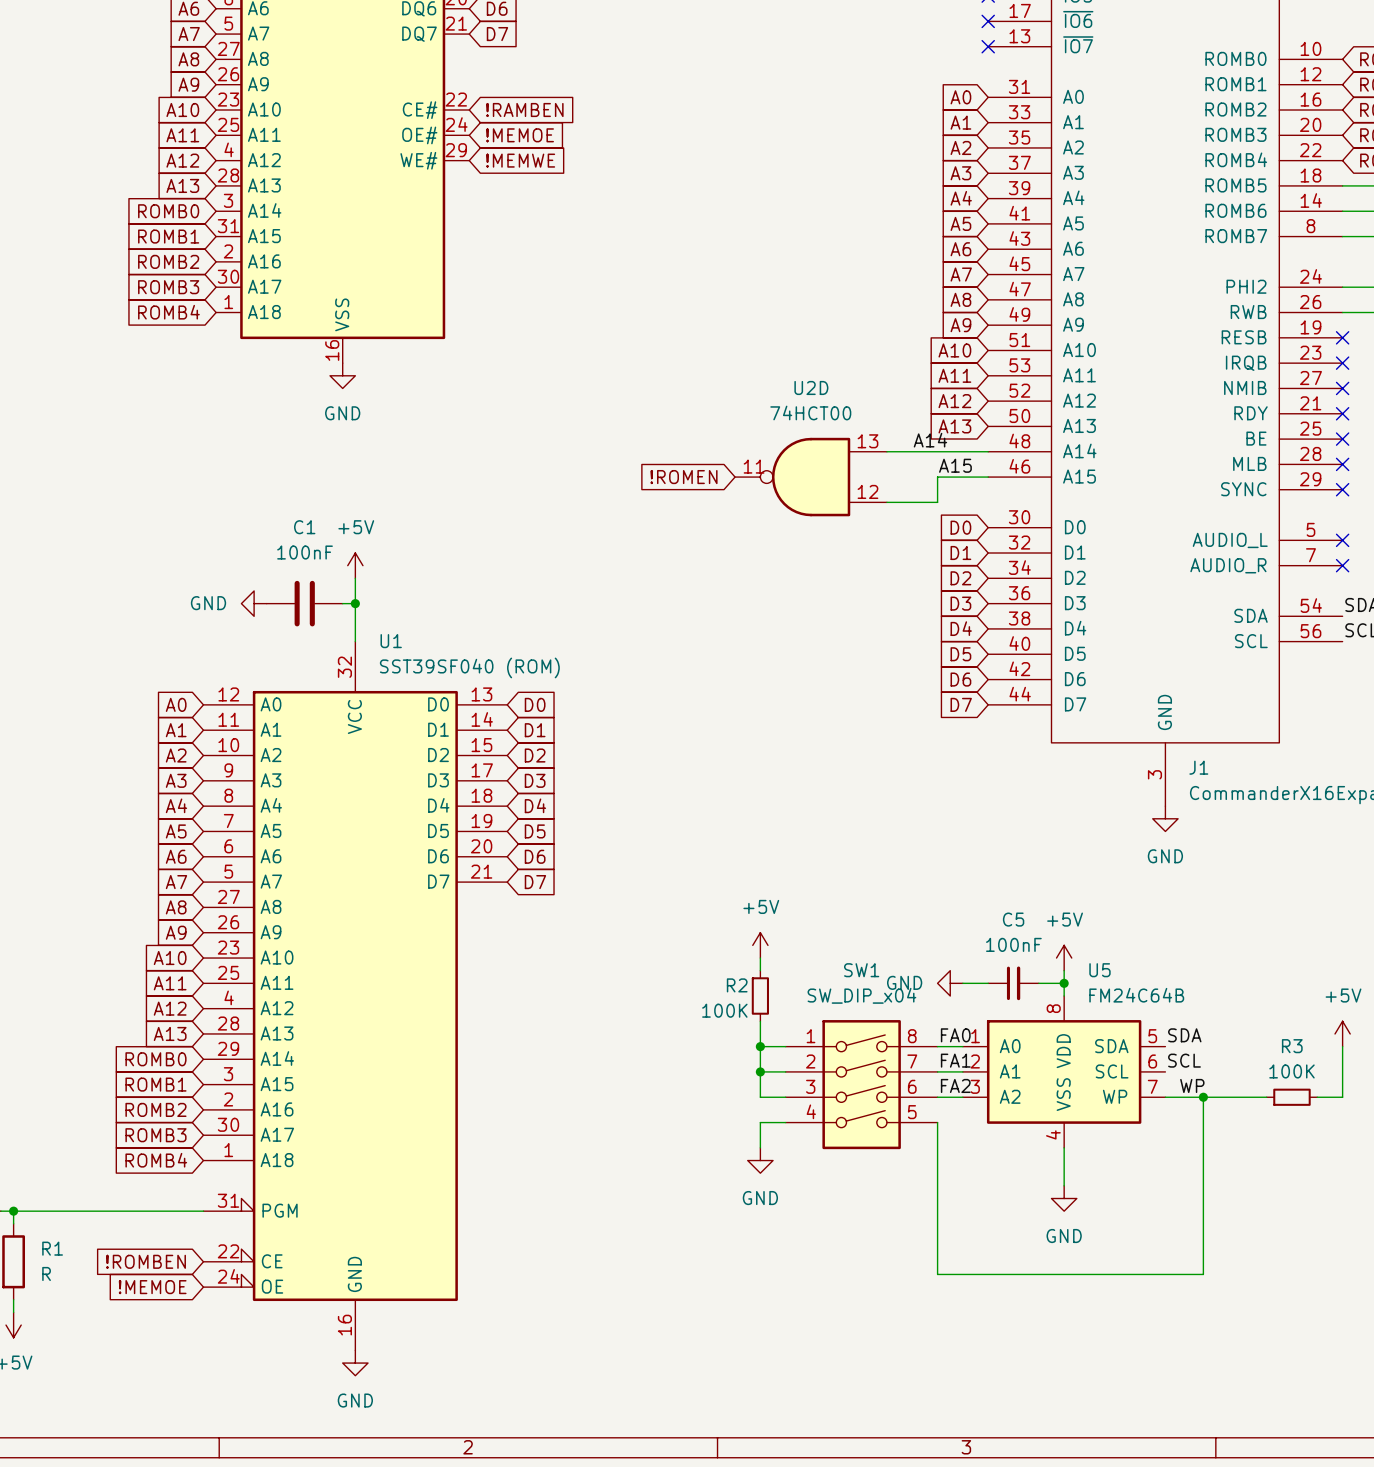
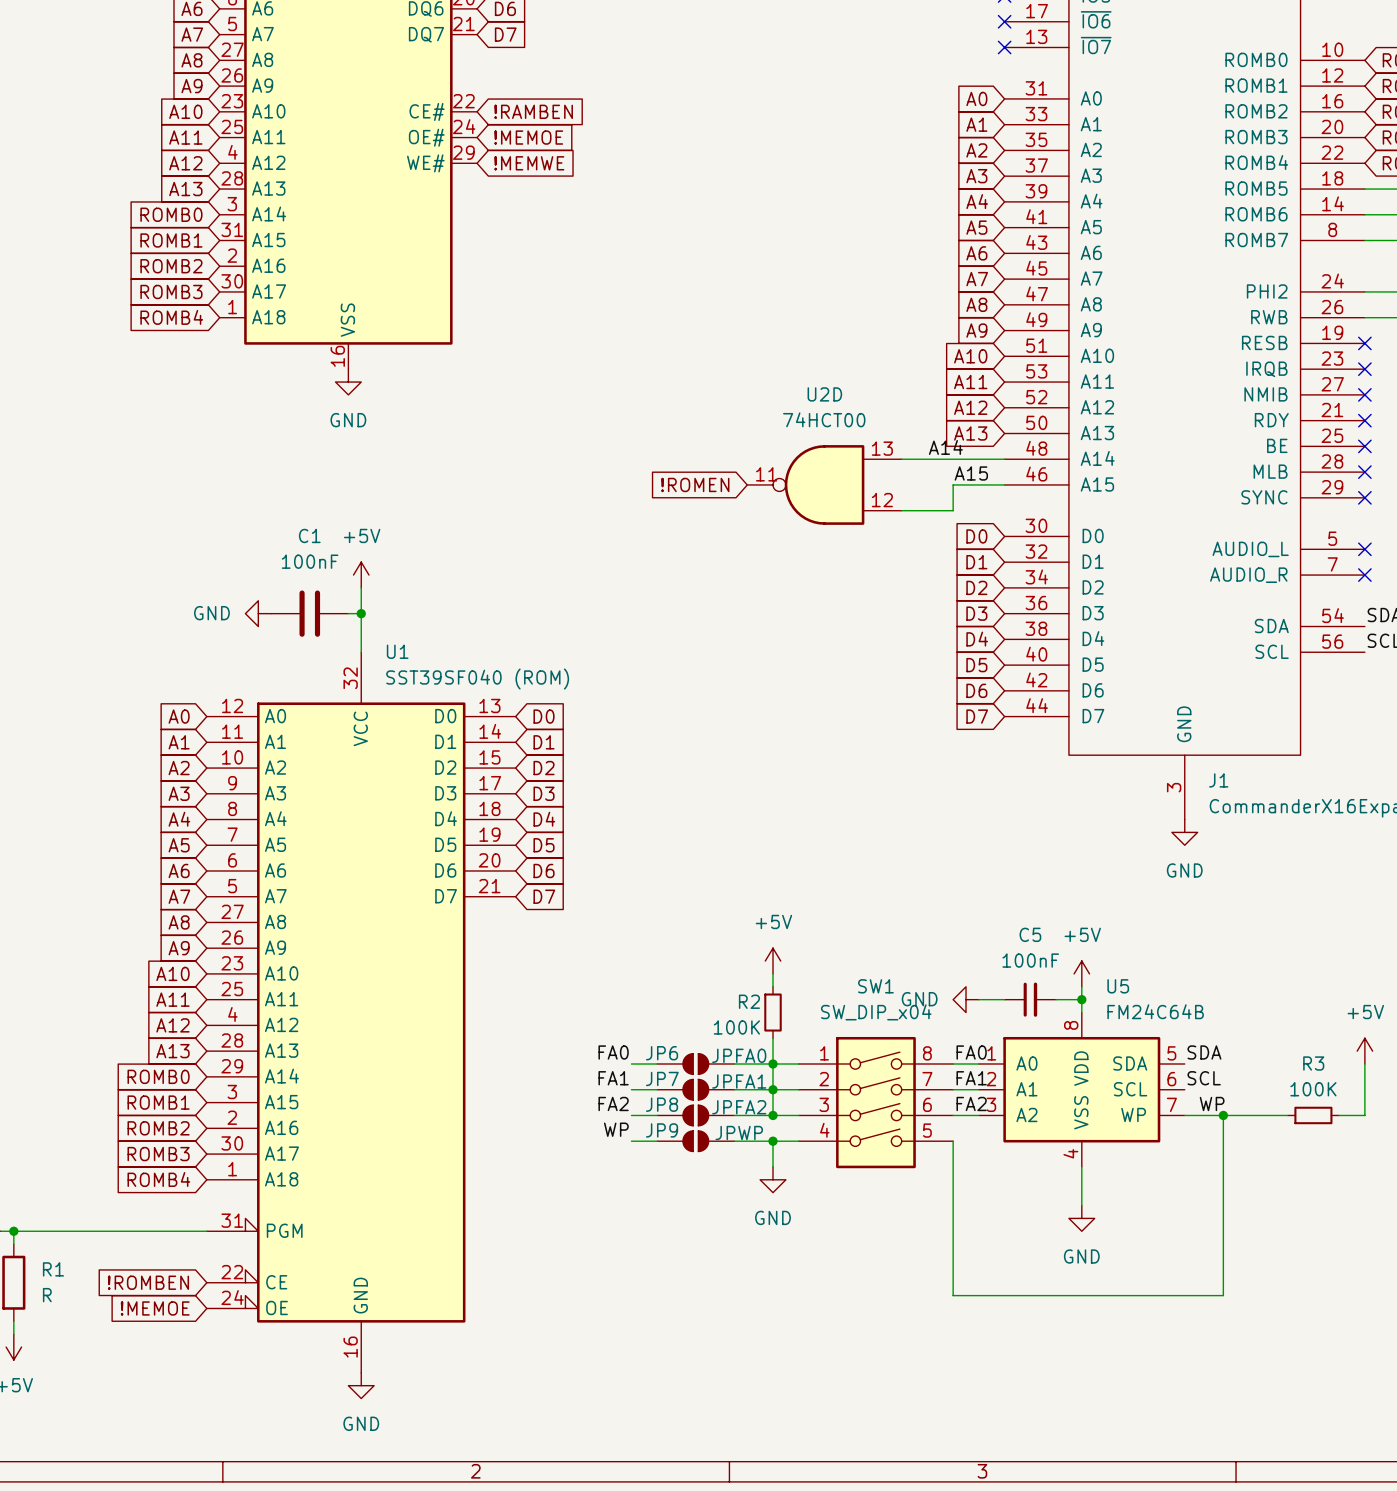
label: none -> FA0 (613, 1052)
wire: none -> (631, 1064) (657, 1064)
JP6: none -> JPFA0 (695, 1064)
wire: none -> (734, 1064) (773, 1064)
label: none -> FA1 (613, 1078)
wire: none -> (631, 1089) (657, 1089)
JP7: none -> JPFA1 (695, 1089)
wire: none -> (734, 1089) (773, 1089)
label: none -> FA2 (613, 1103)
wire: none -> (631, 1115) (657, 1115)
JP8: none -> JPFA2 (695, 1115)
wire: none -> (734, 1115) (773, 1115)
junction: none -> (773, 1115)
label: none -> WP (616, 1129)
wire: none -> (631, 1141) (657, 1141)
JP9: none -> JPWP (695, 1141)
wire: none -> (734, 1141) (773, 1141)
junction: none -> (773, 1141)

